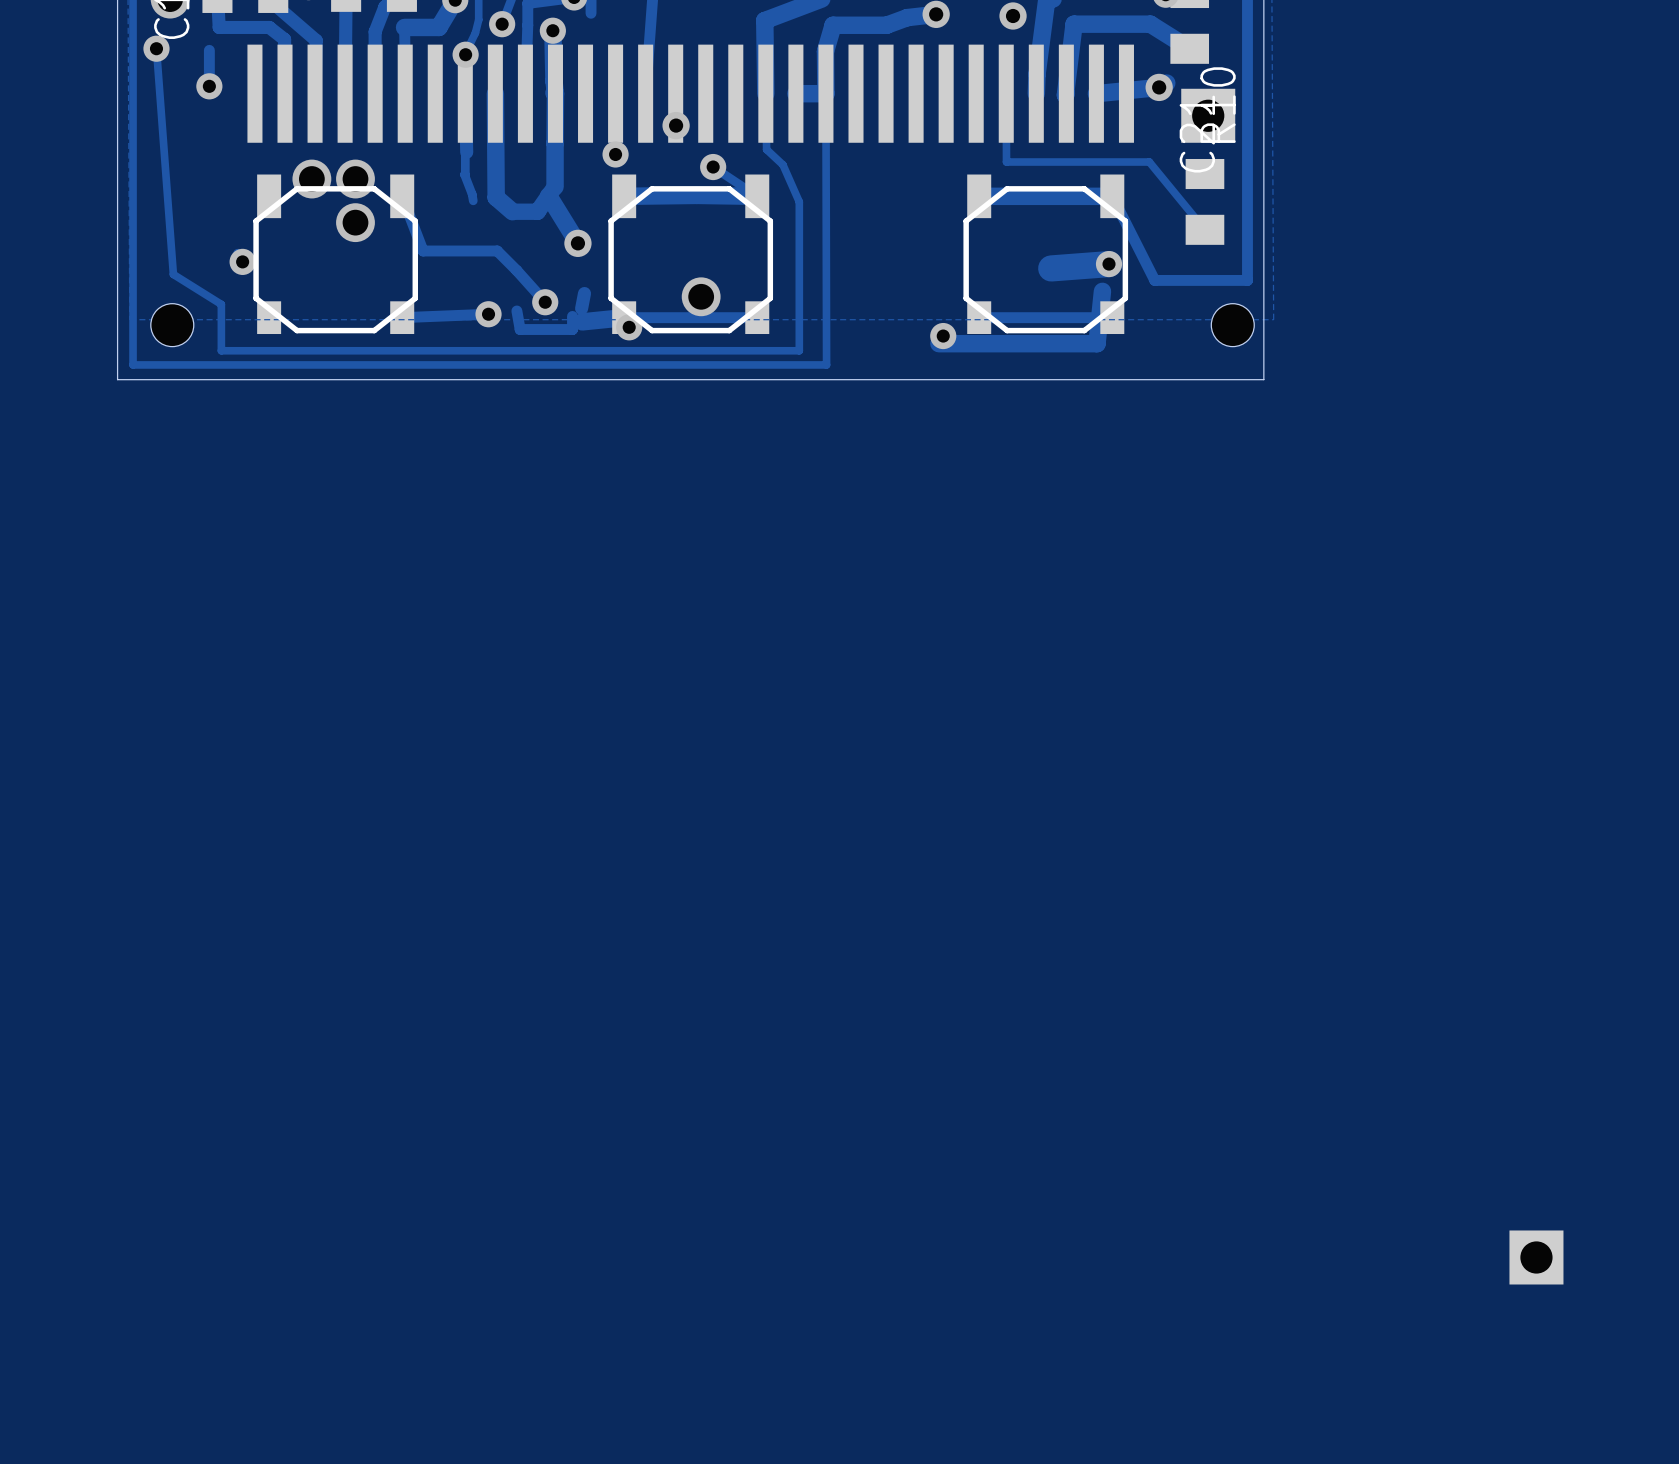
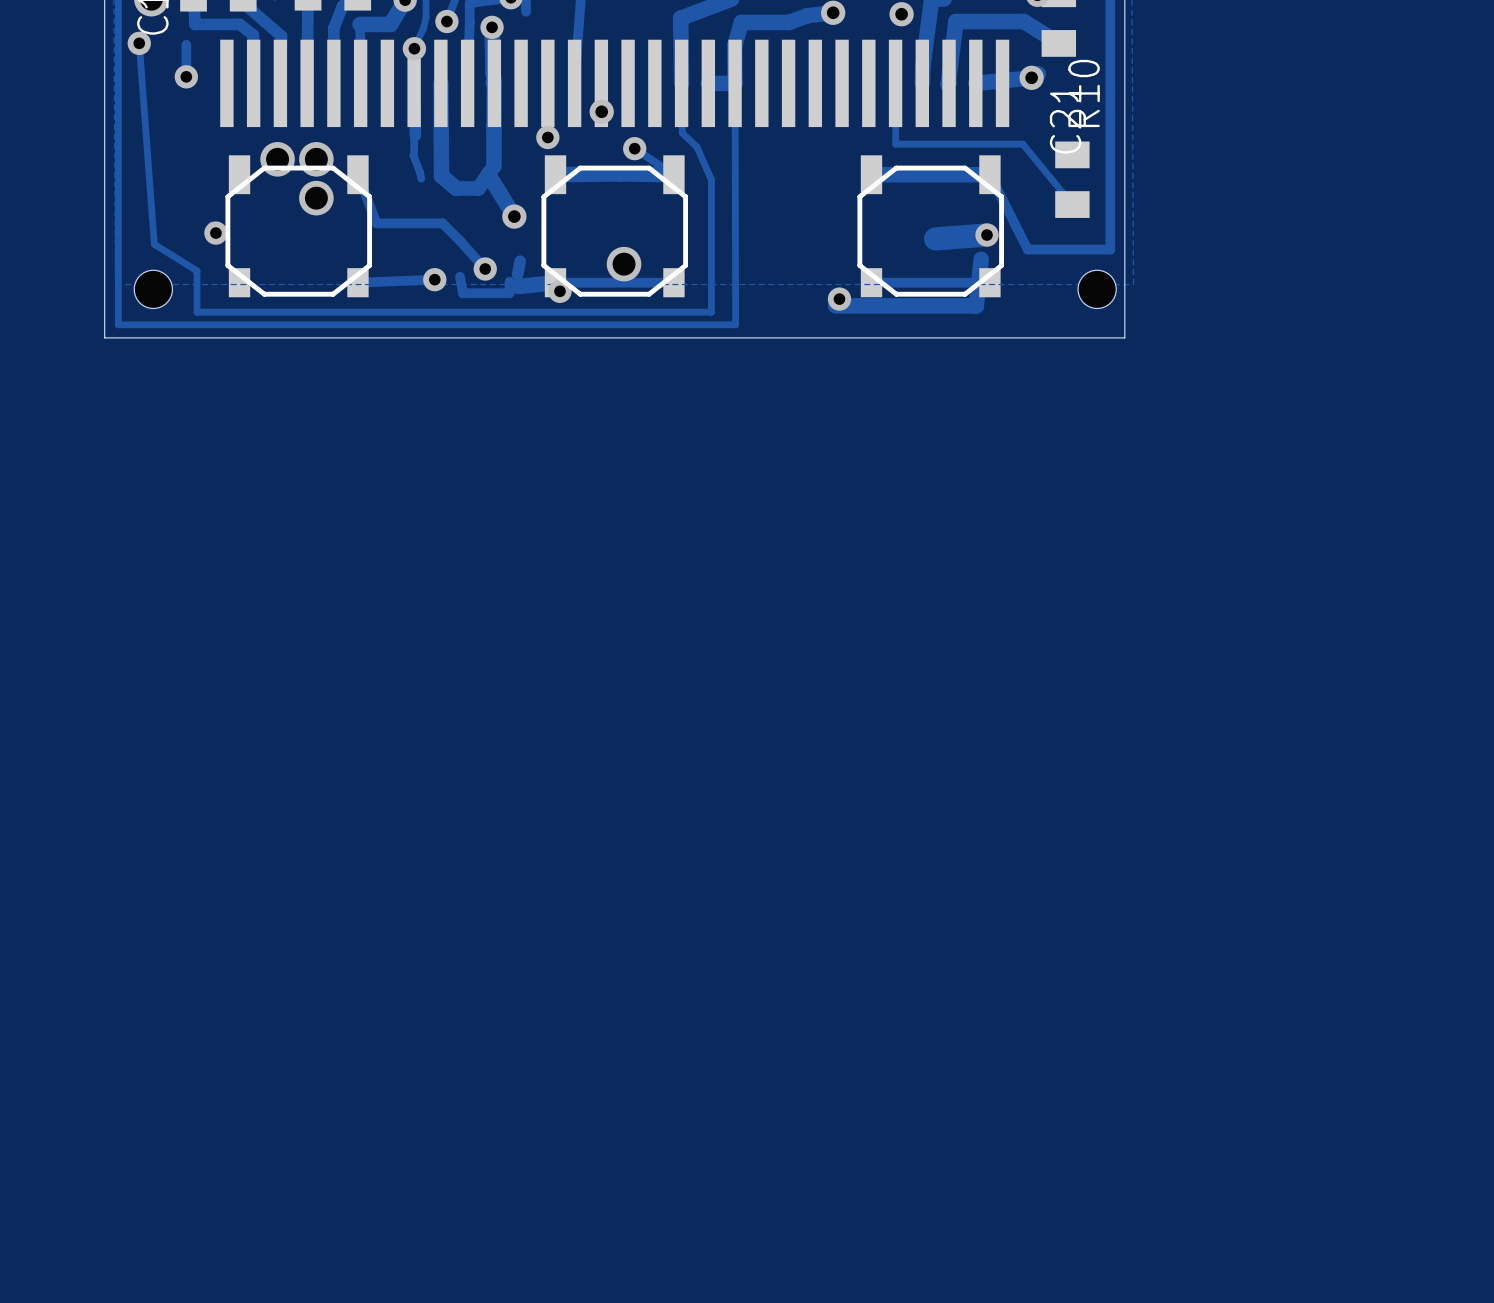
part: (1208, 115) -> none
part: (1536, 1257) -> none

